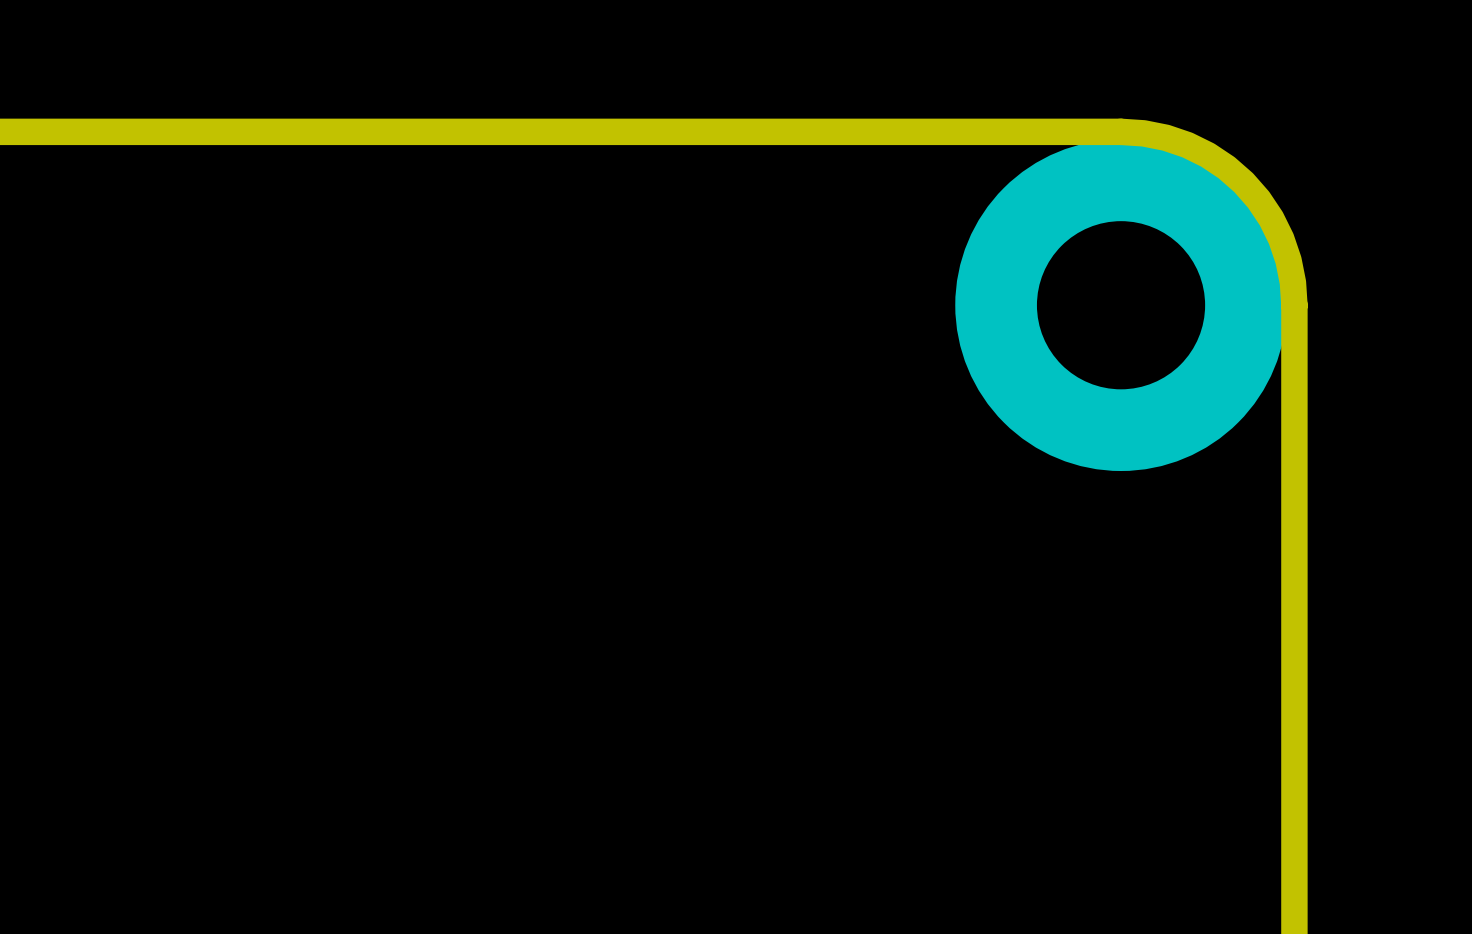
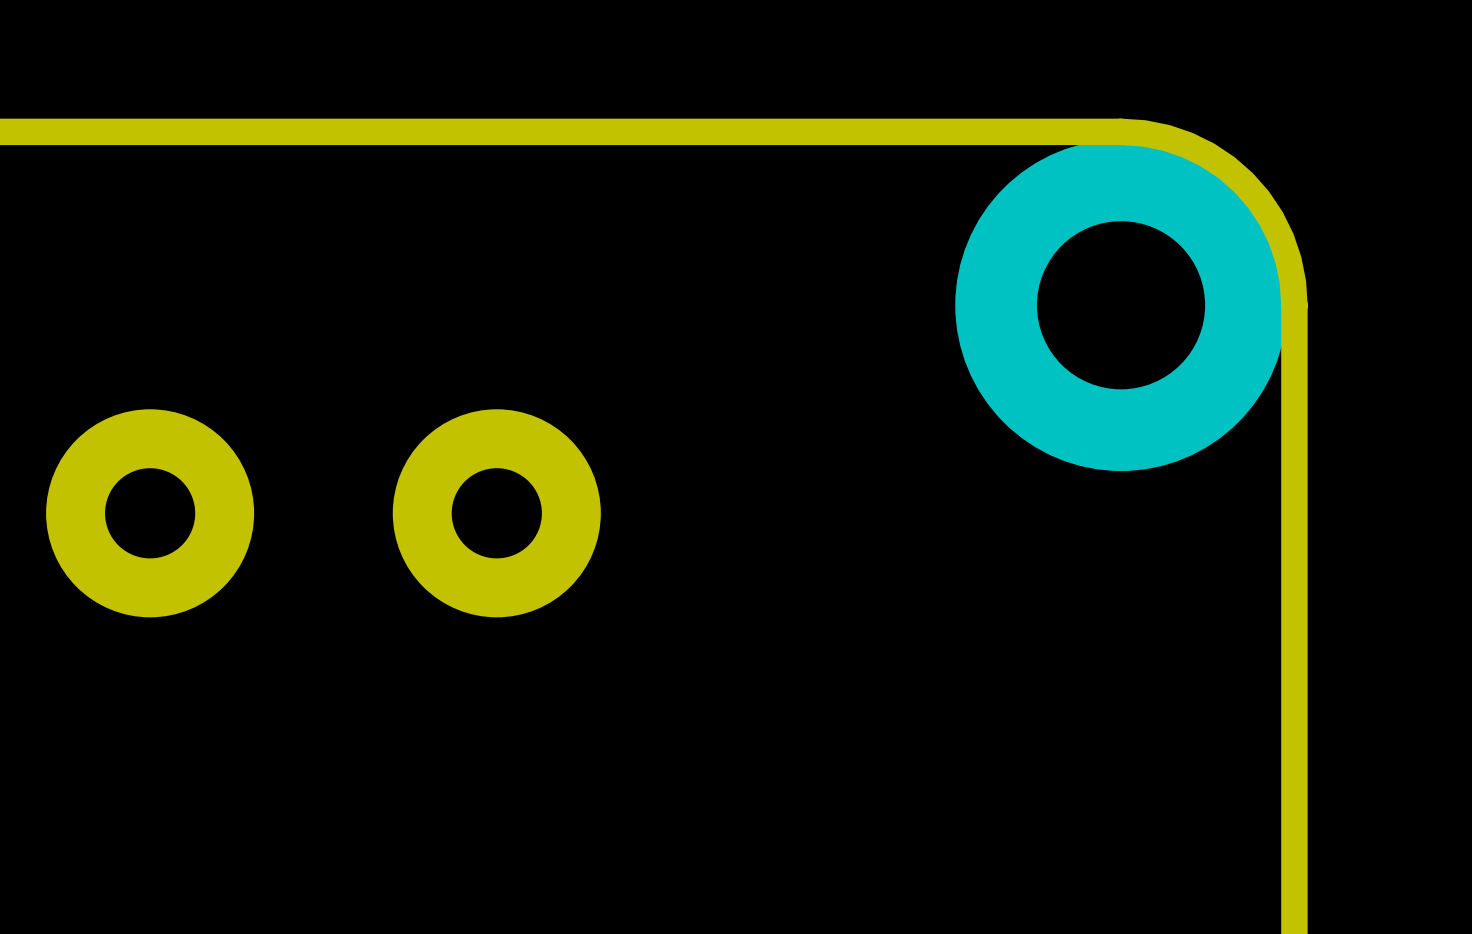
part: none -> (323, 513)

